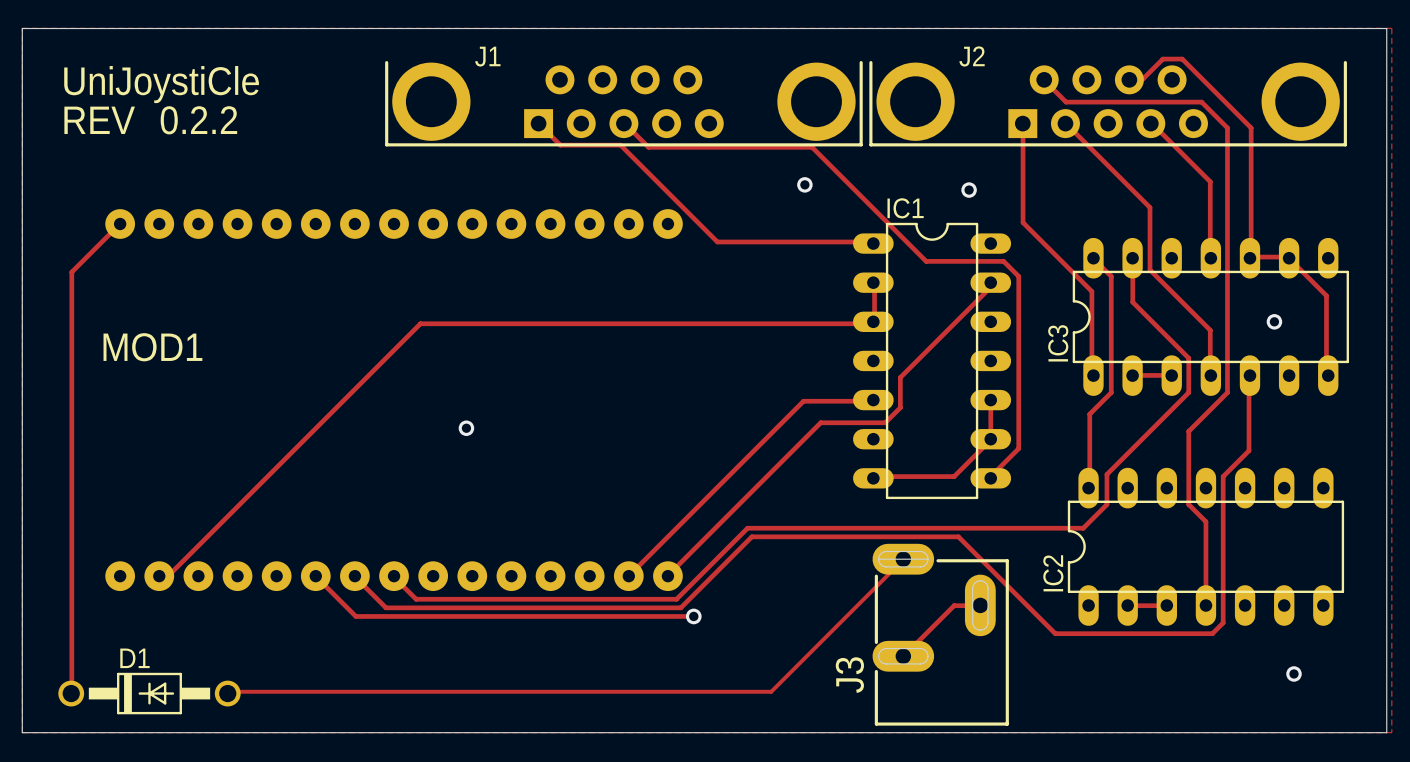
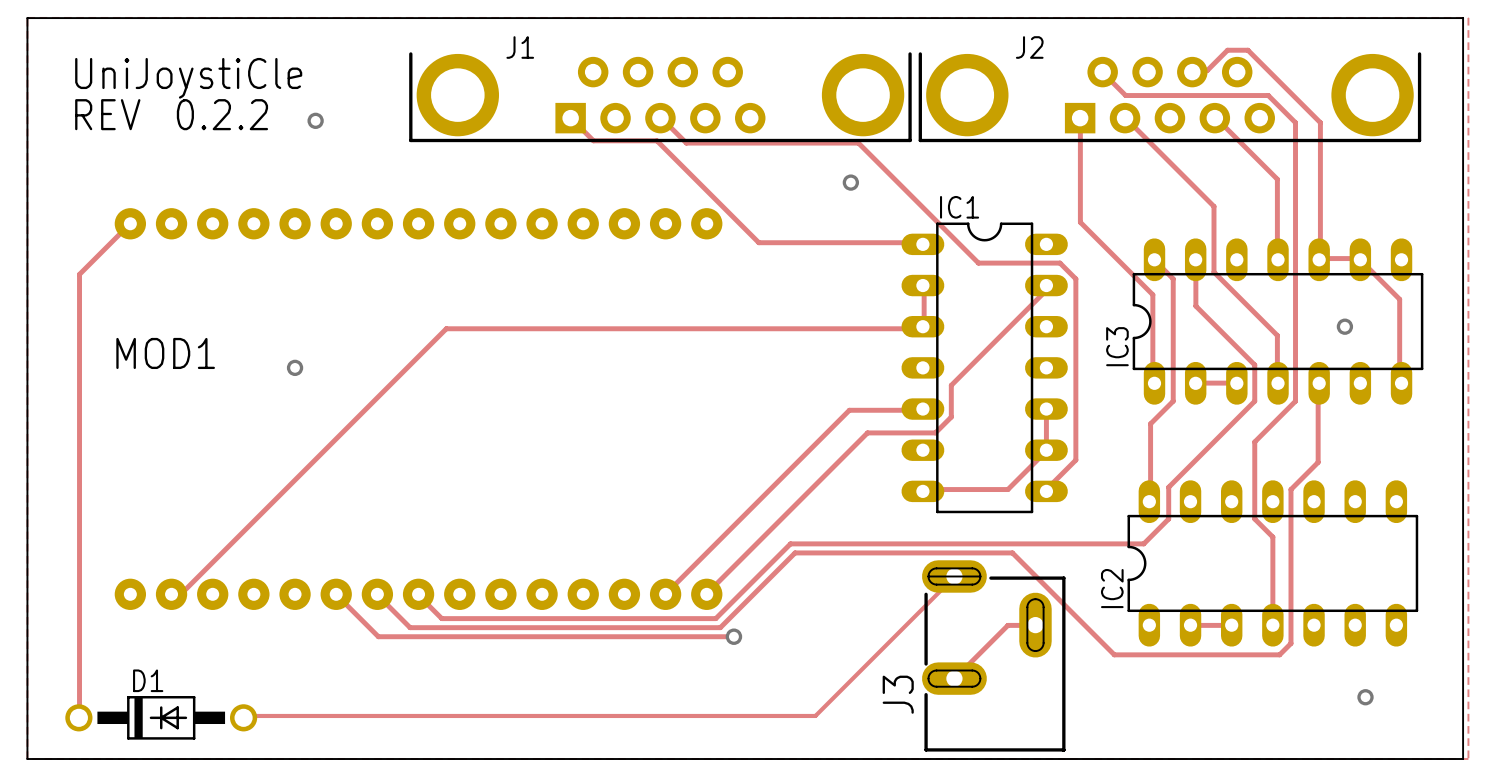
via: none -> (315, 120)
via: (969, 190) -> none
via: none -> (295, 367)
via: (466, 428) -> none

